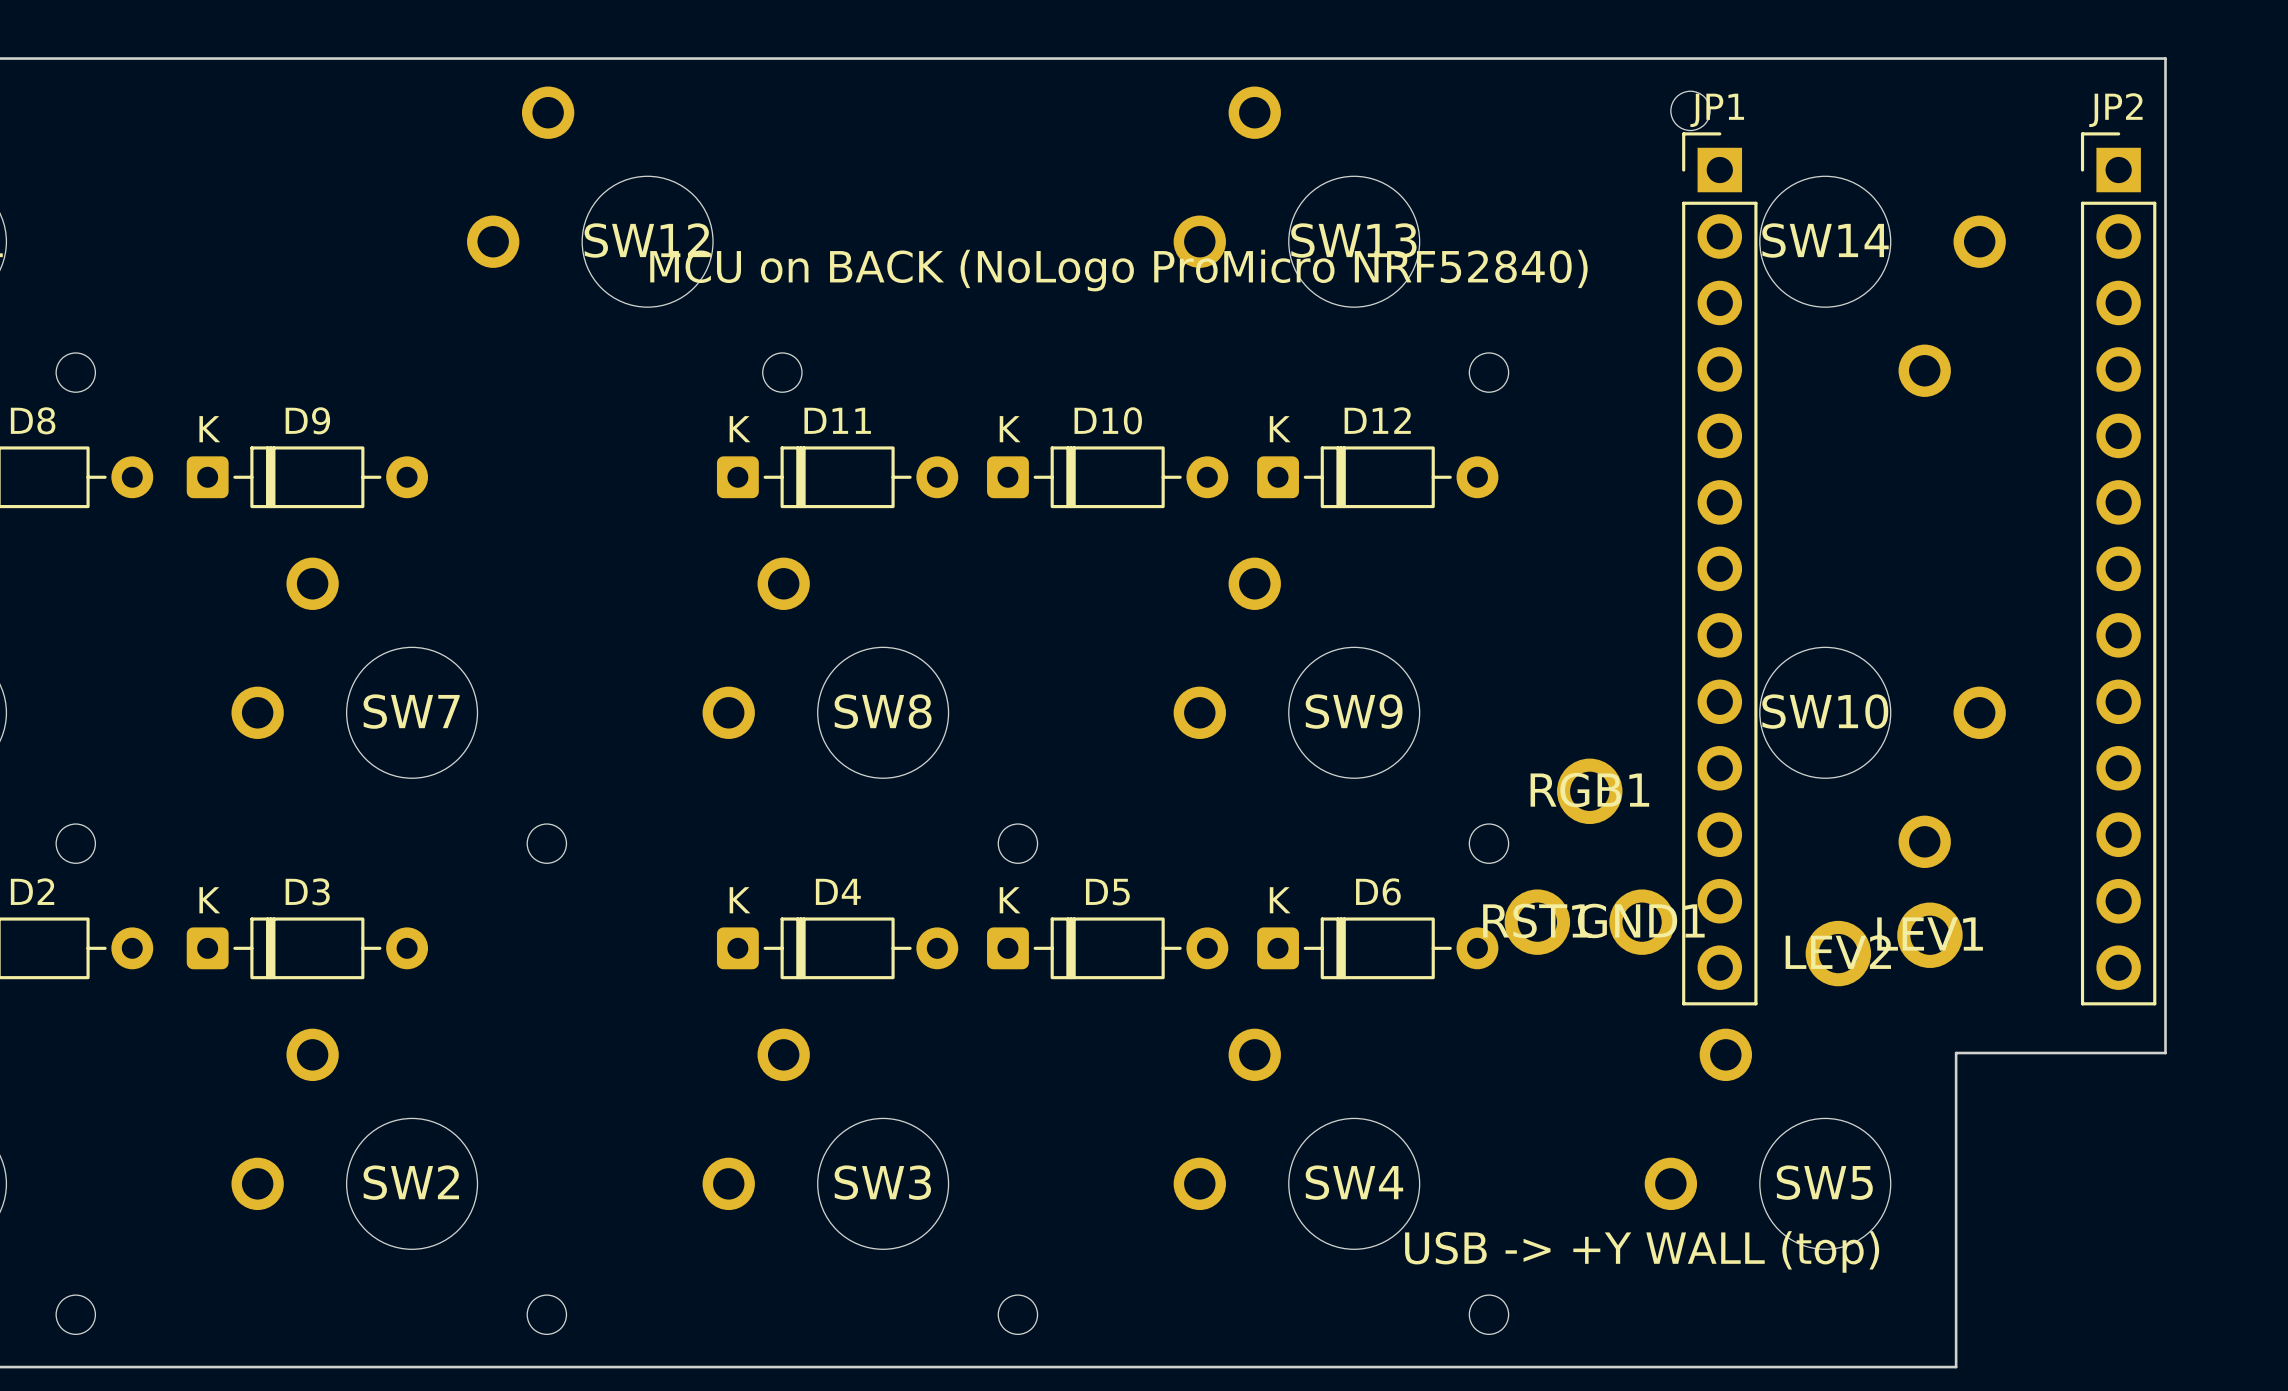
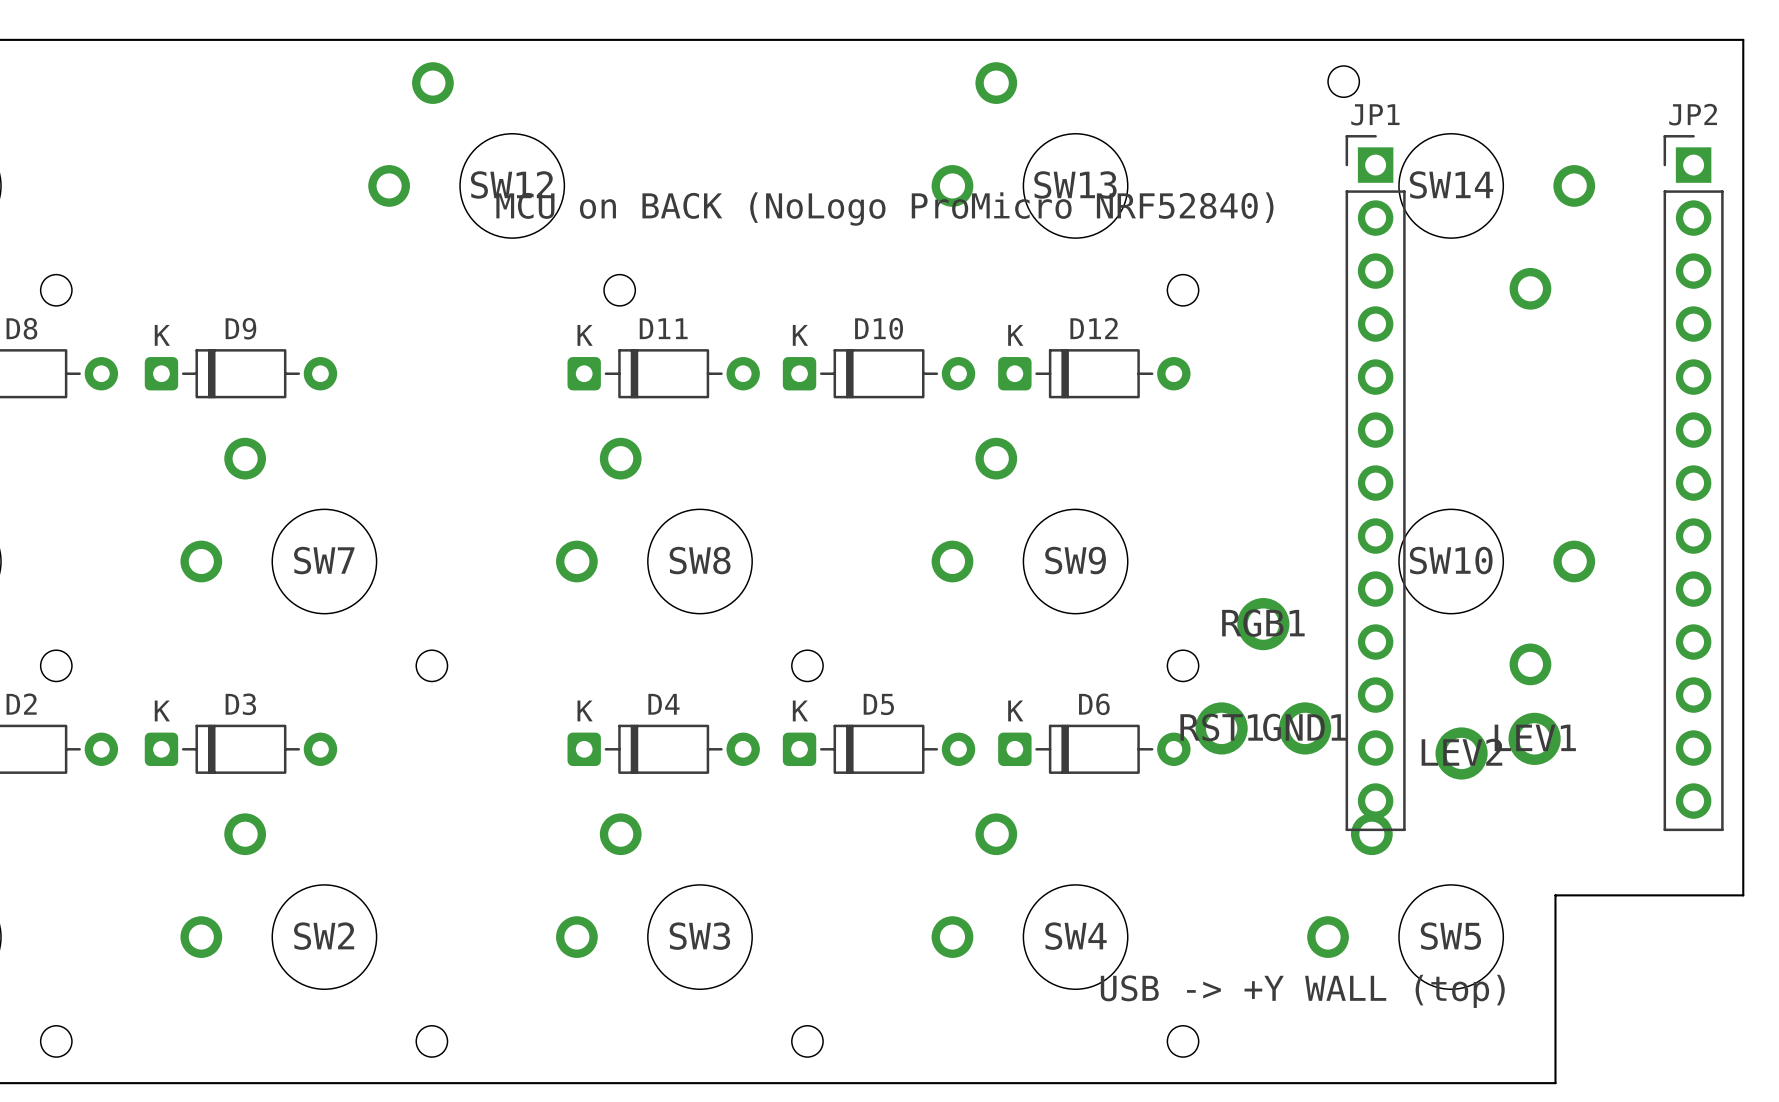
board edge: (2165, 58) (2165, 1053) (1956, 1053) (1956, 1131) -> (1722, 39) (1743, 39) (1743, 895) (1555, 895)
JP1 position: (1719, 568) -> (1375, 483)
JP2 position: (2118, 568) -> (1693, 483)

